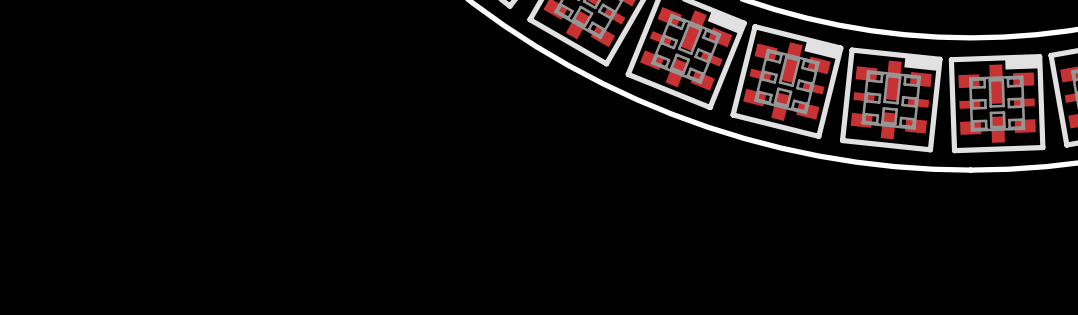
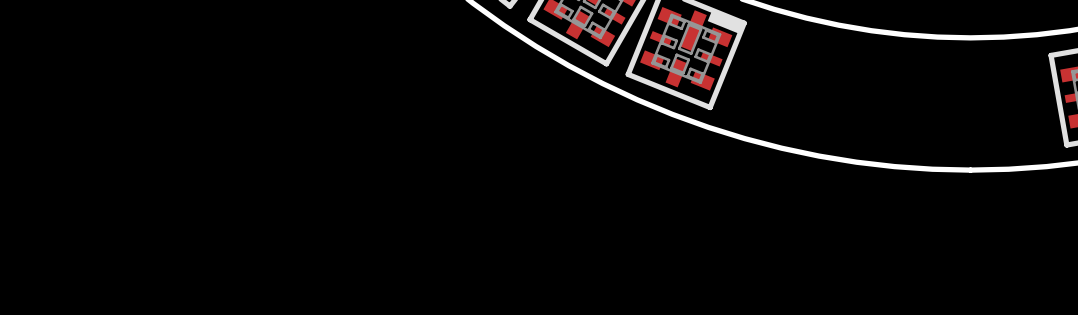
part: (786, 81) -> none
part: (891, 99) -> none
part: (997, 103) -> none

